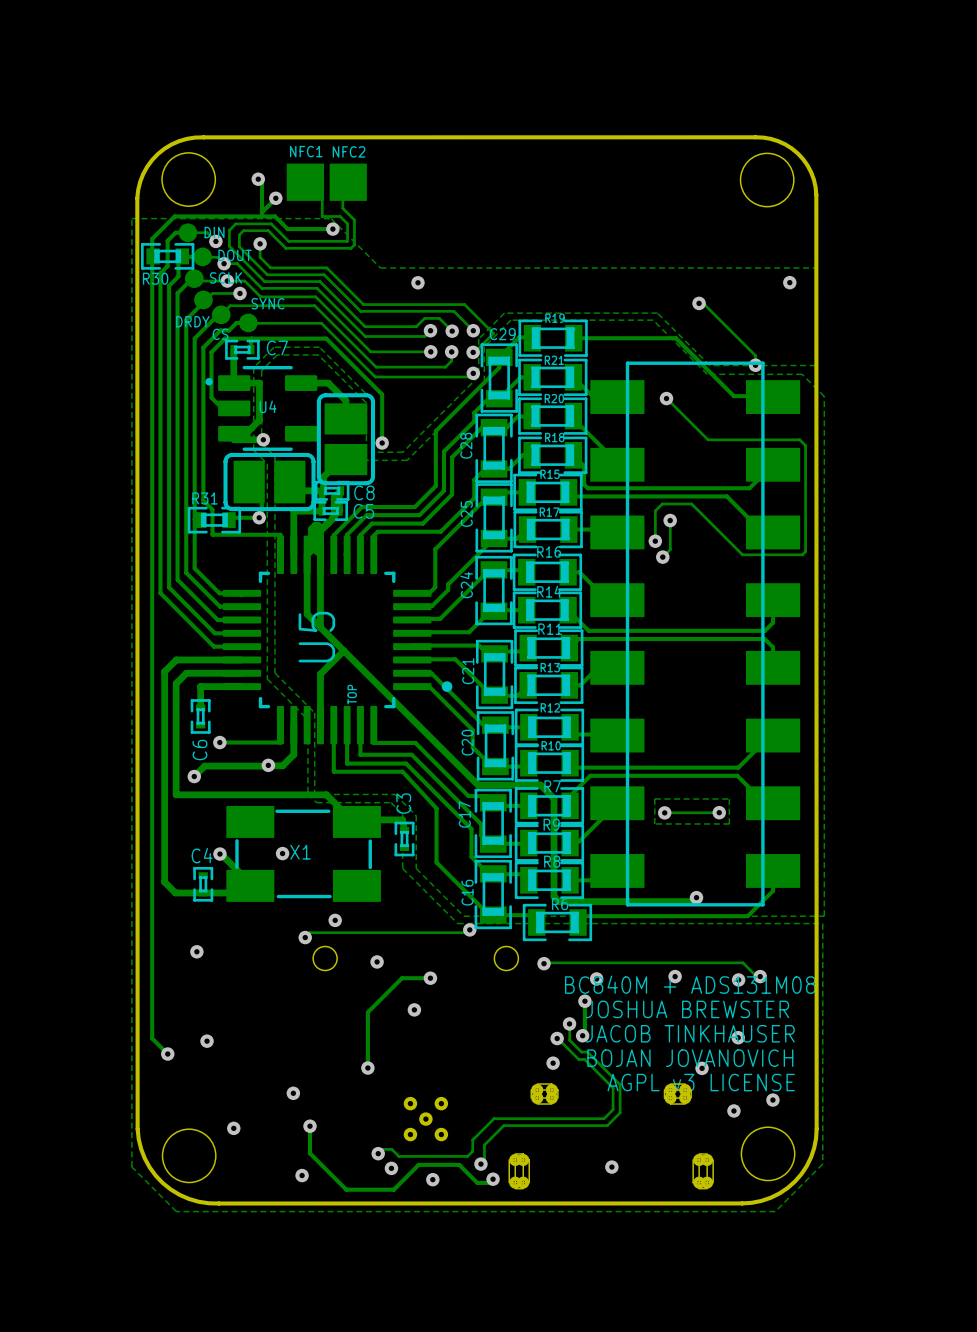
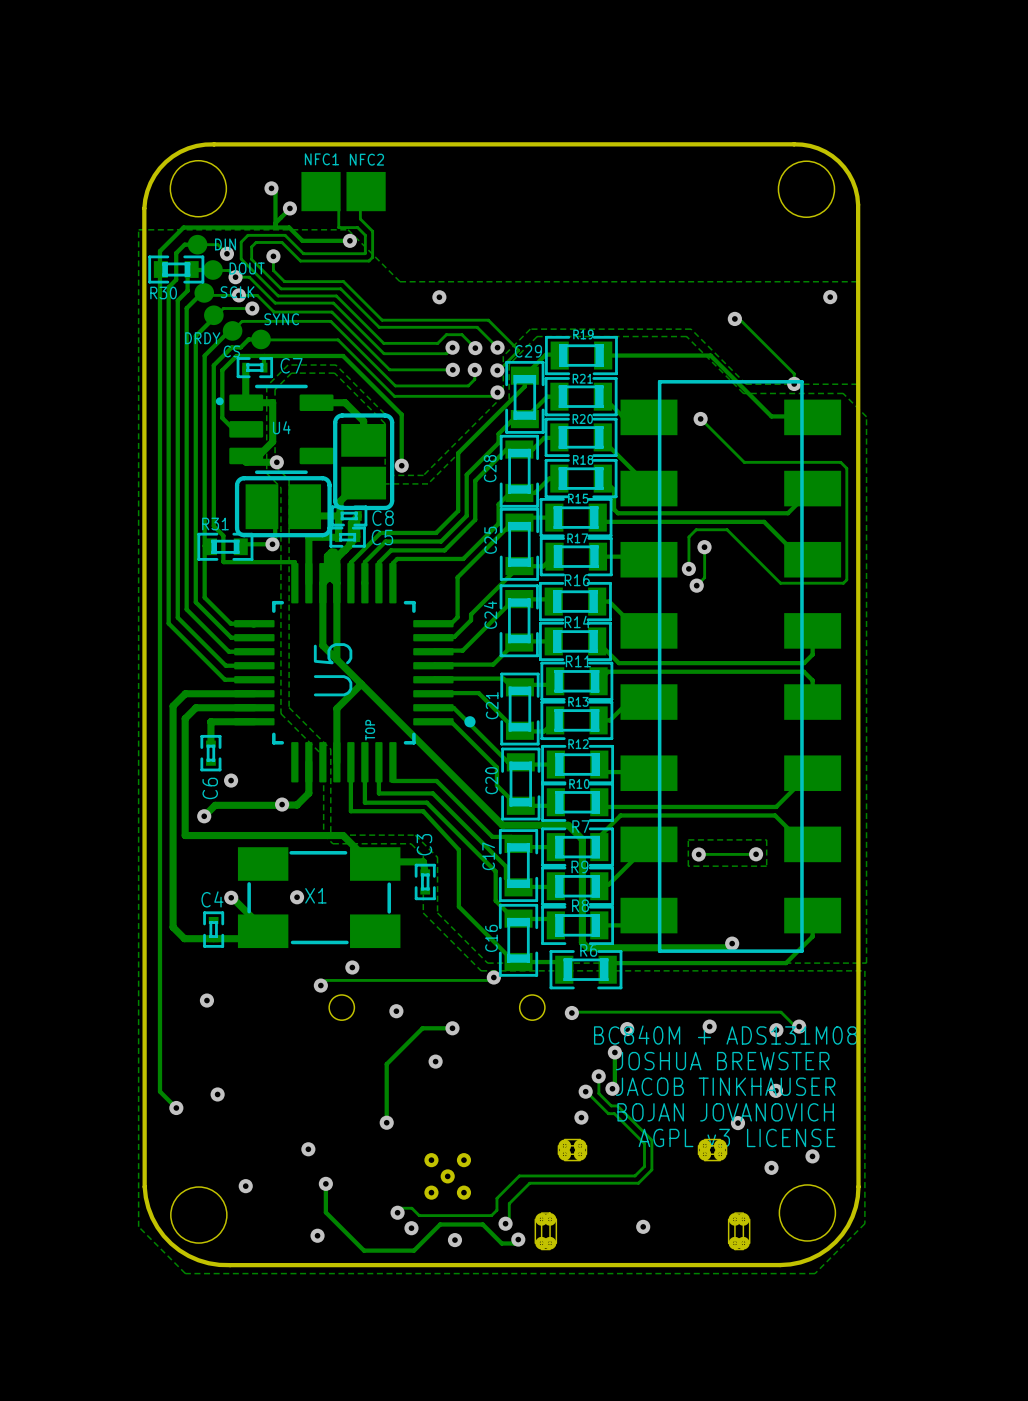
track: (280, 725) (280, 742) (219, 742) -> none

